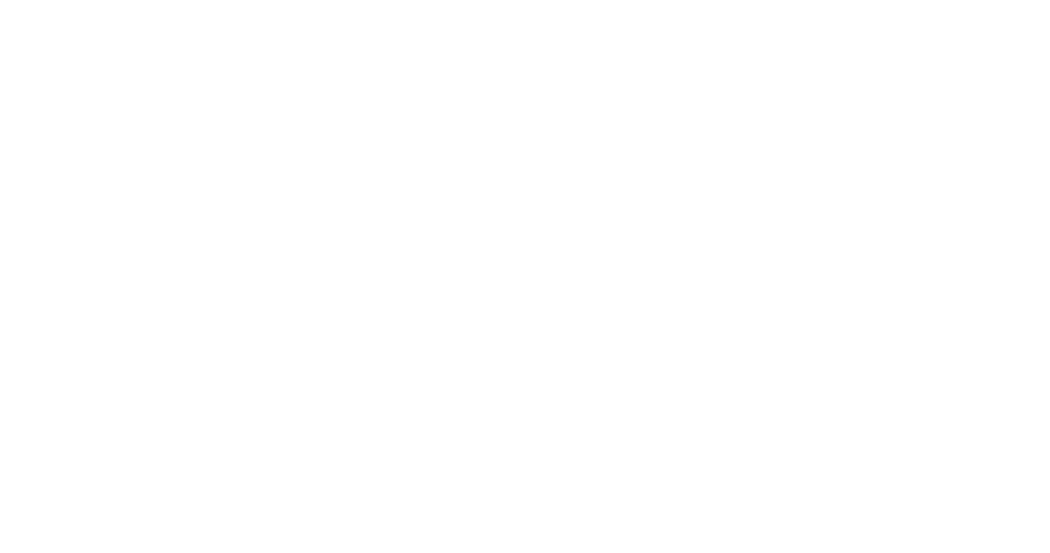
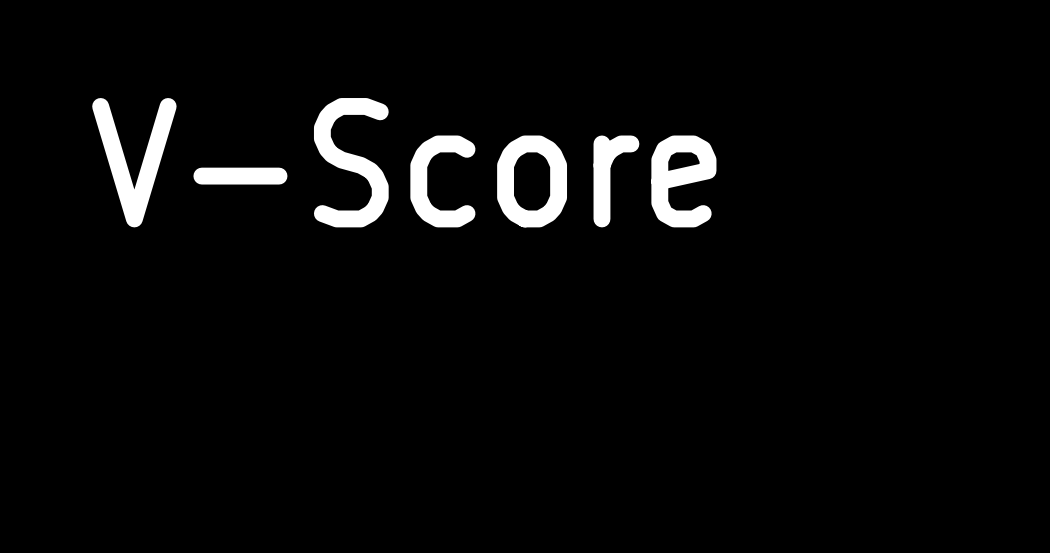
text: none -> V-Score (404, 162)

